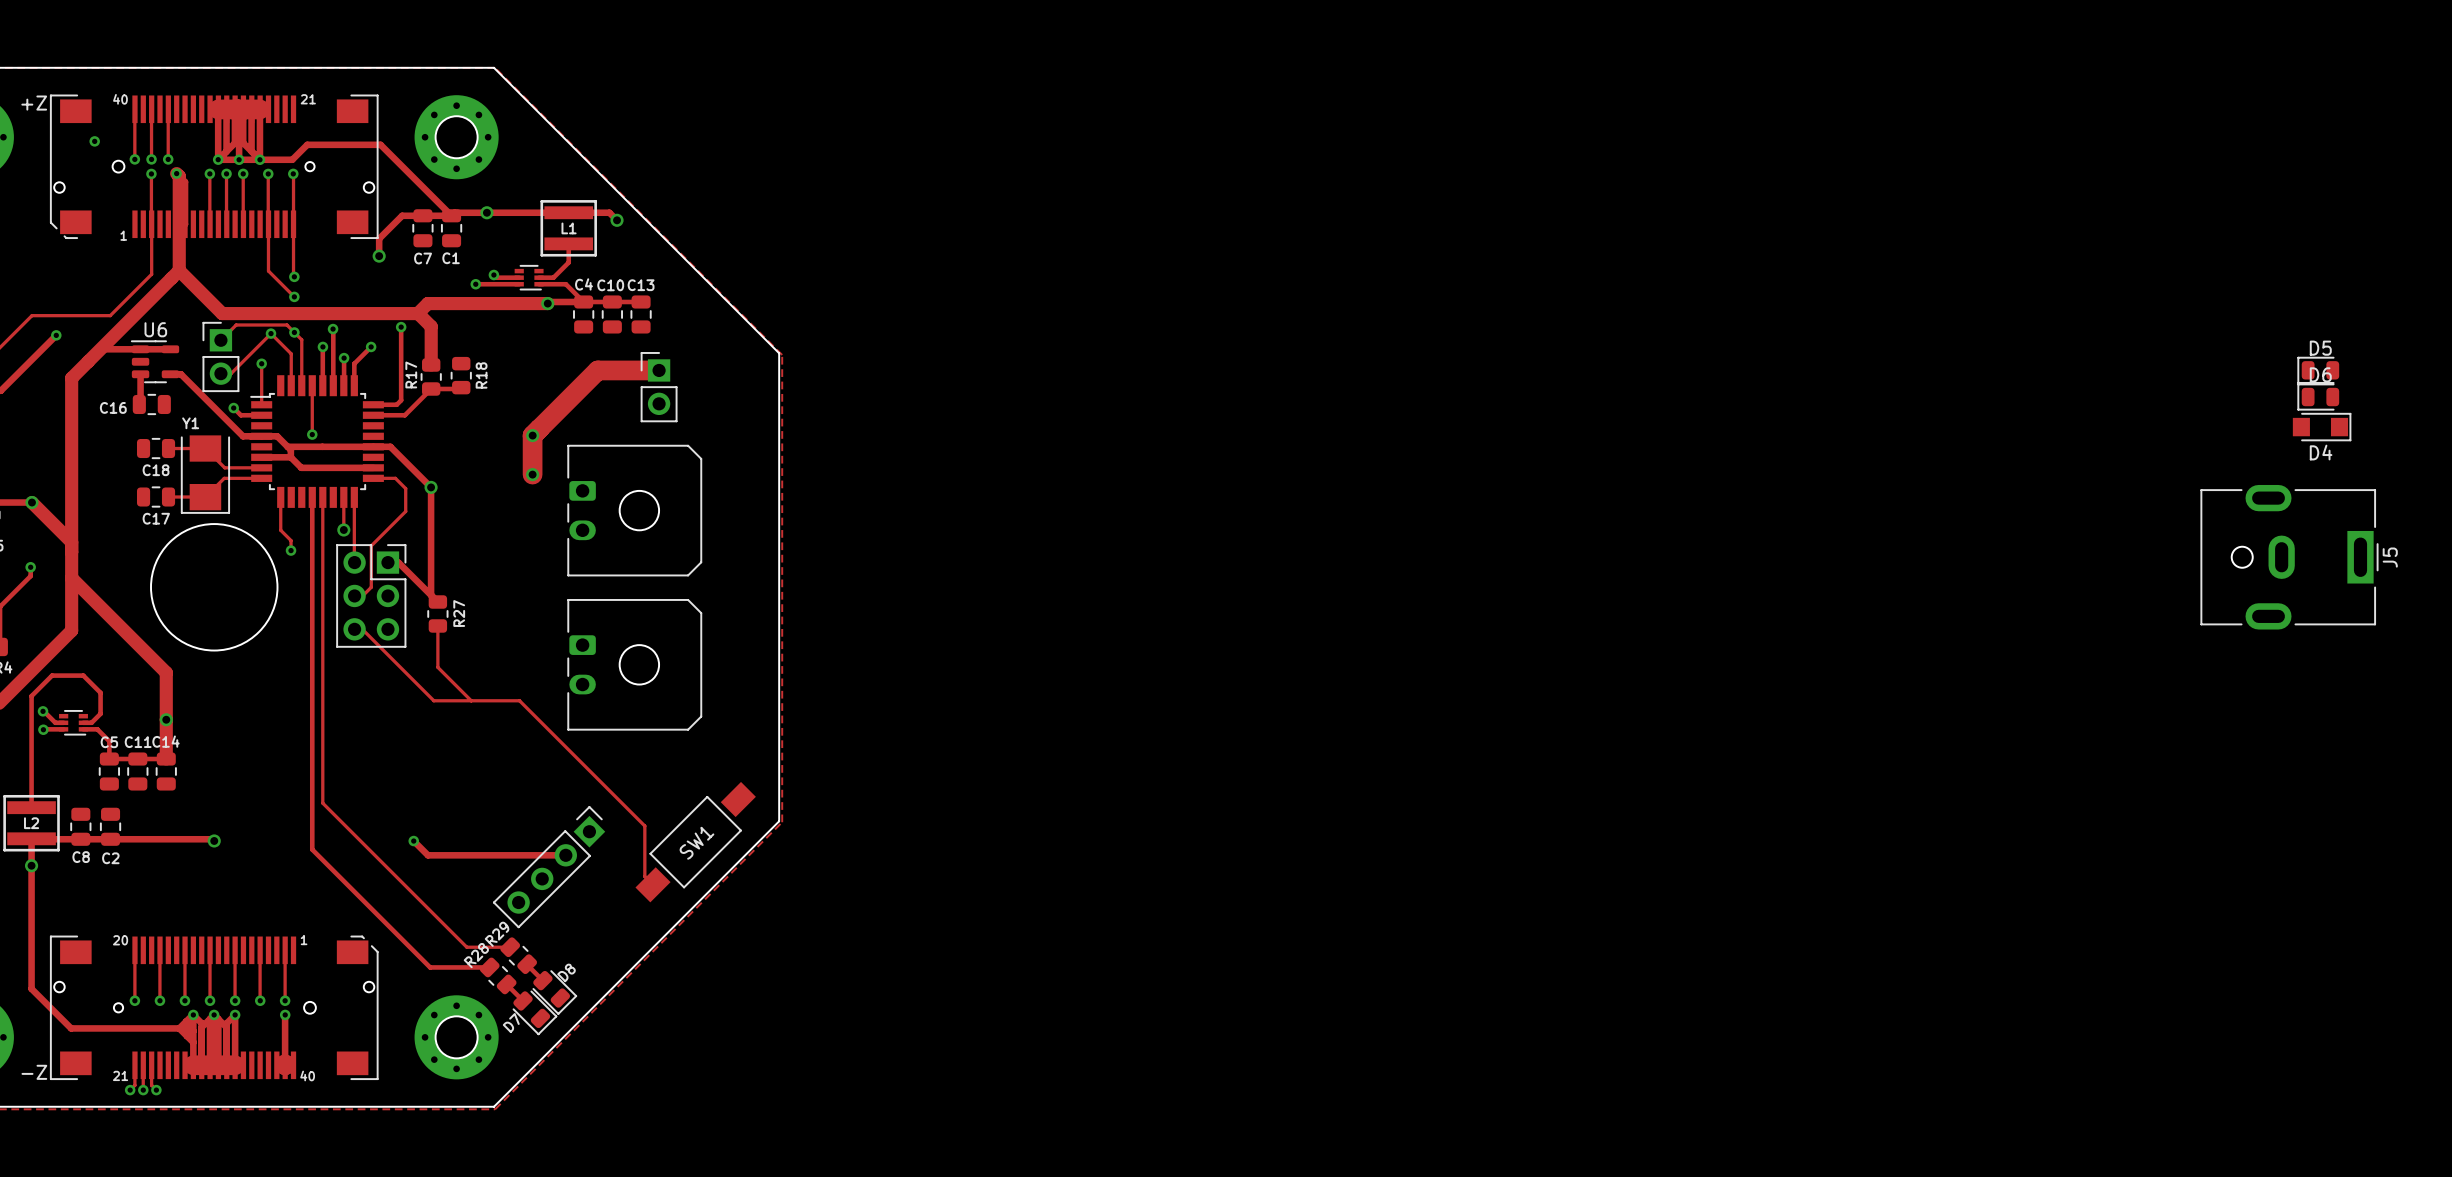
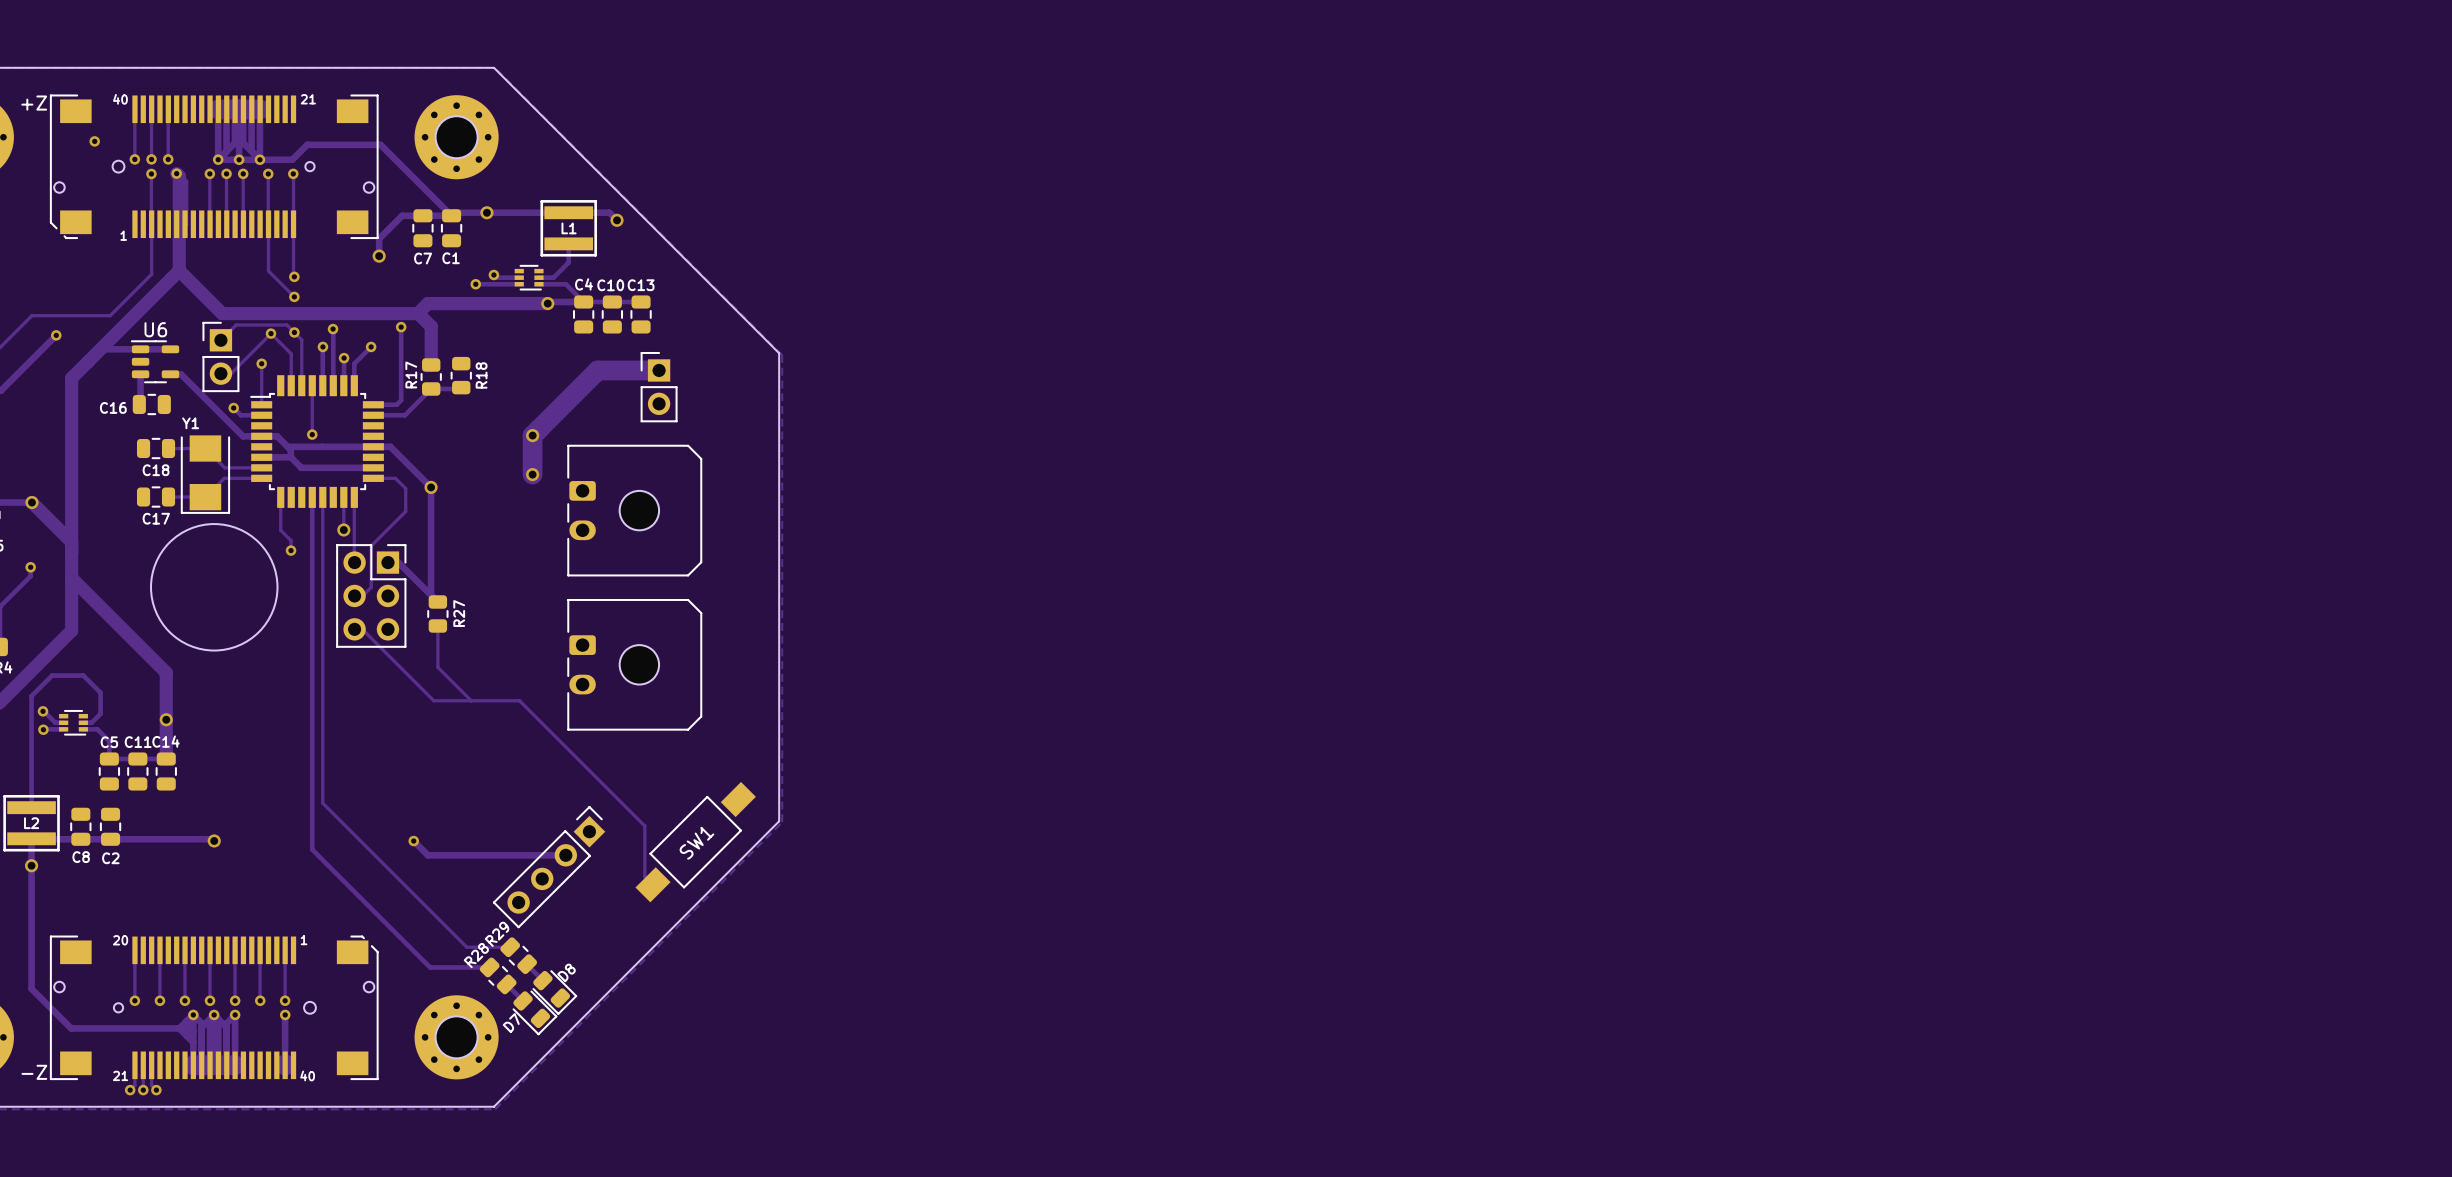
D5: (2318, 370) -> none
D6: (2318, 397) -> none
D4: (2322, 427) -> none
J5: (2289, 557) -> none

